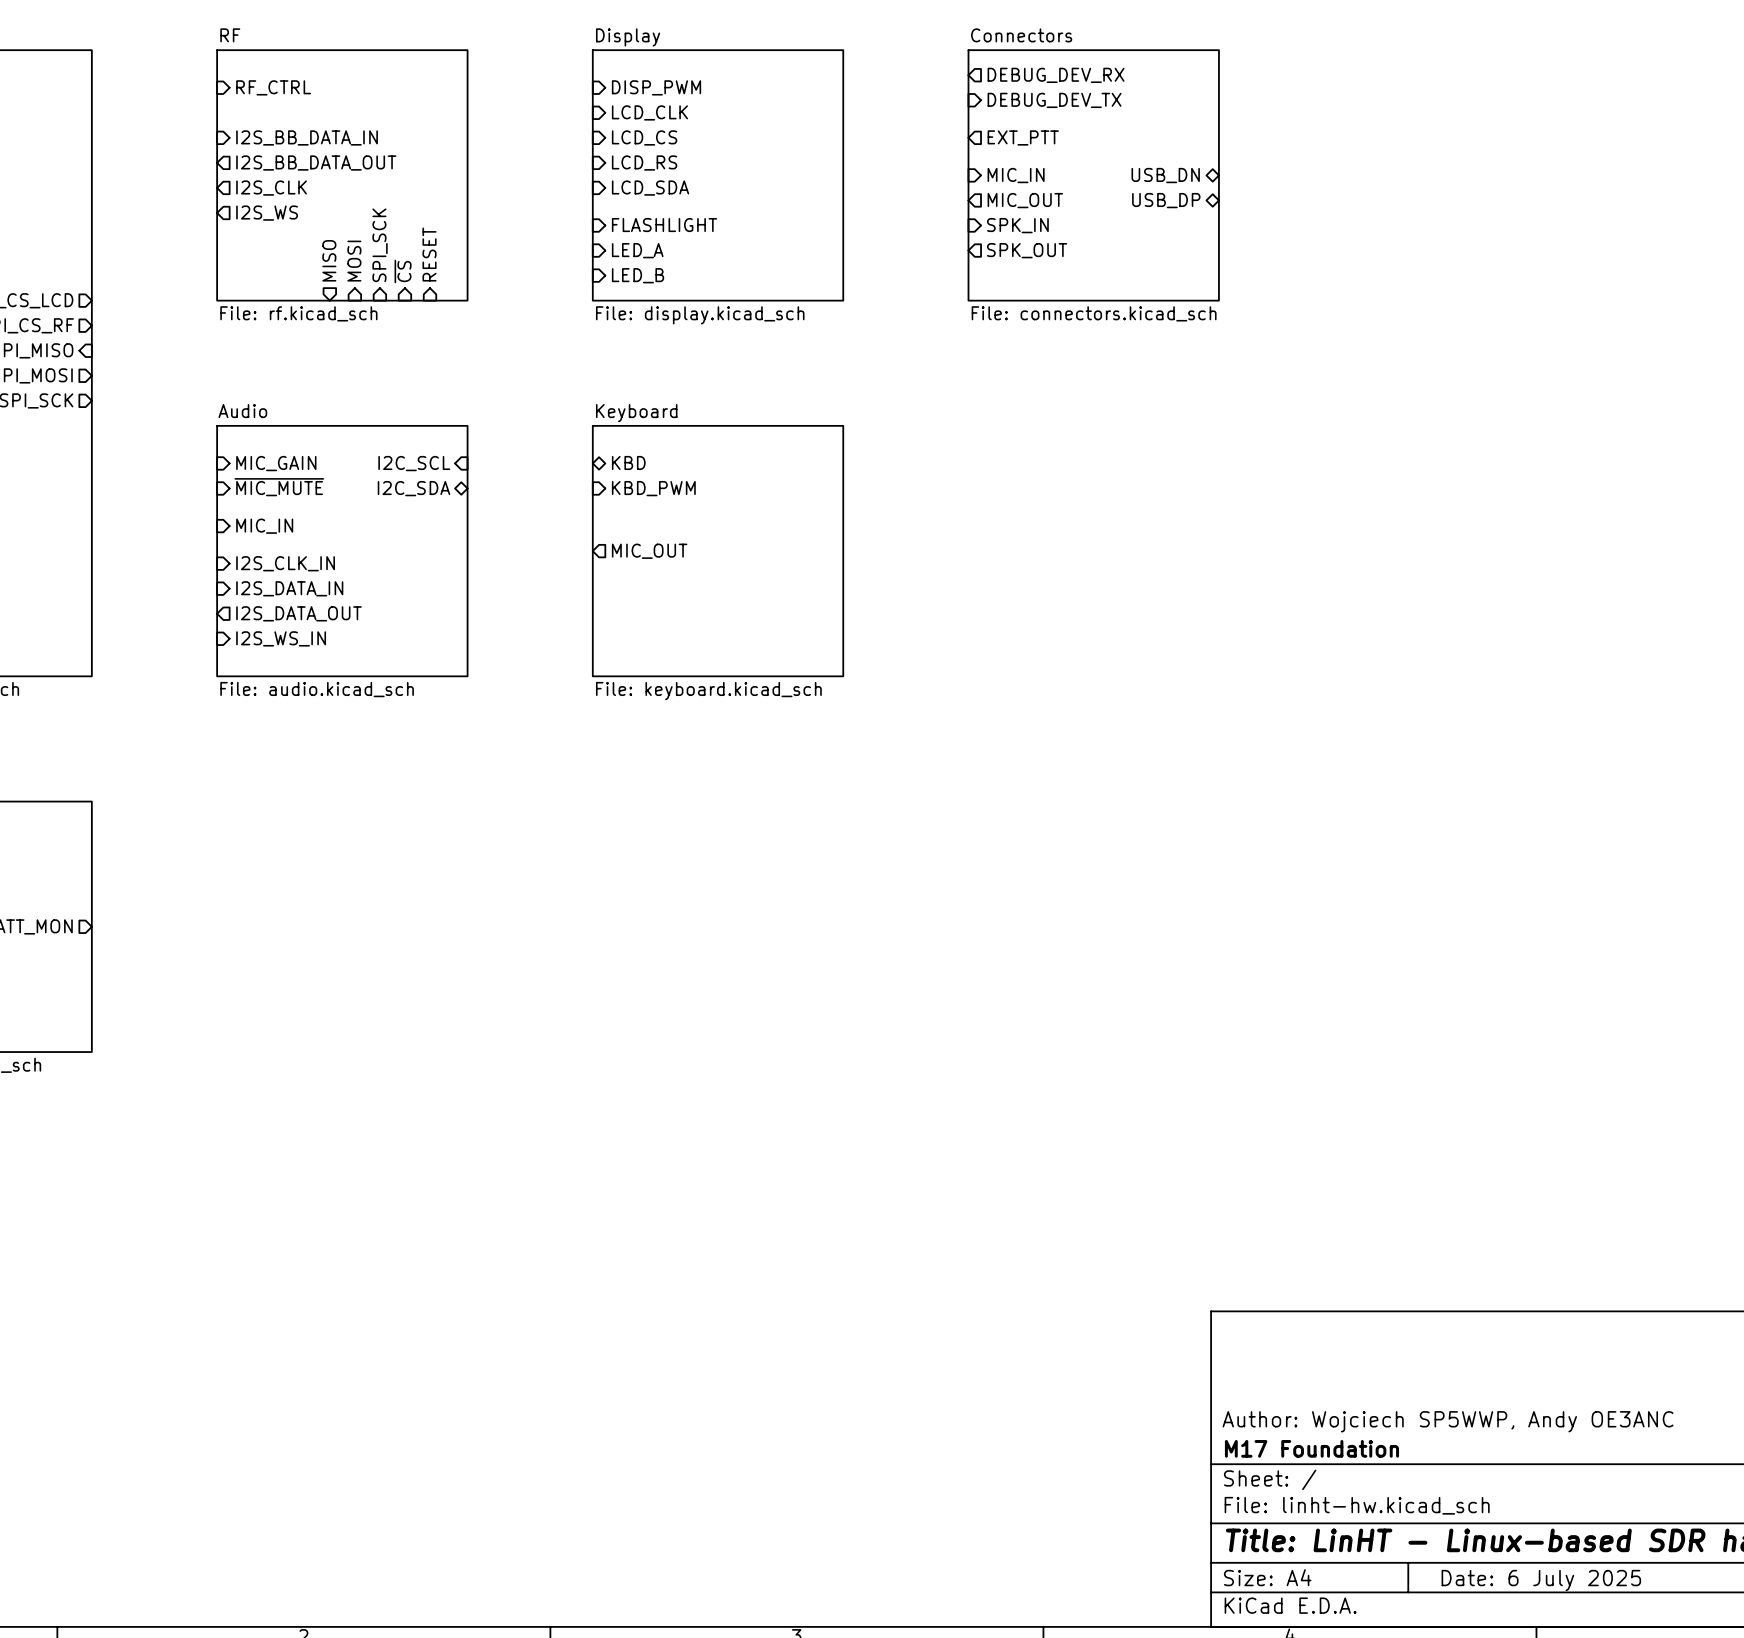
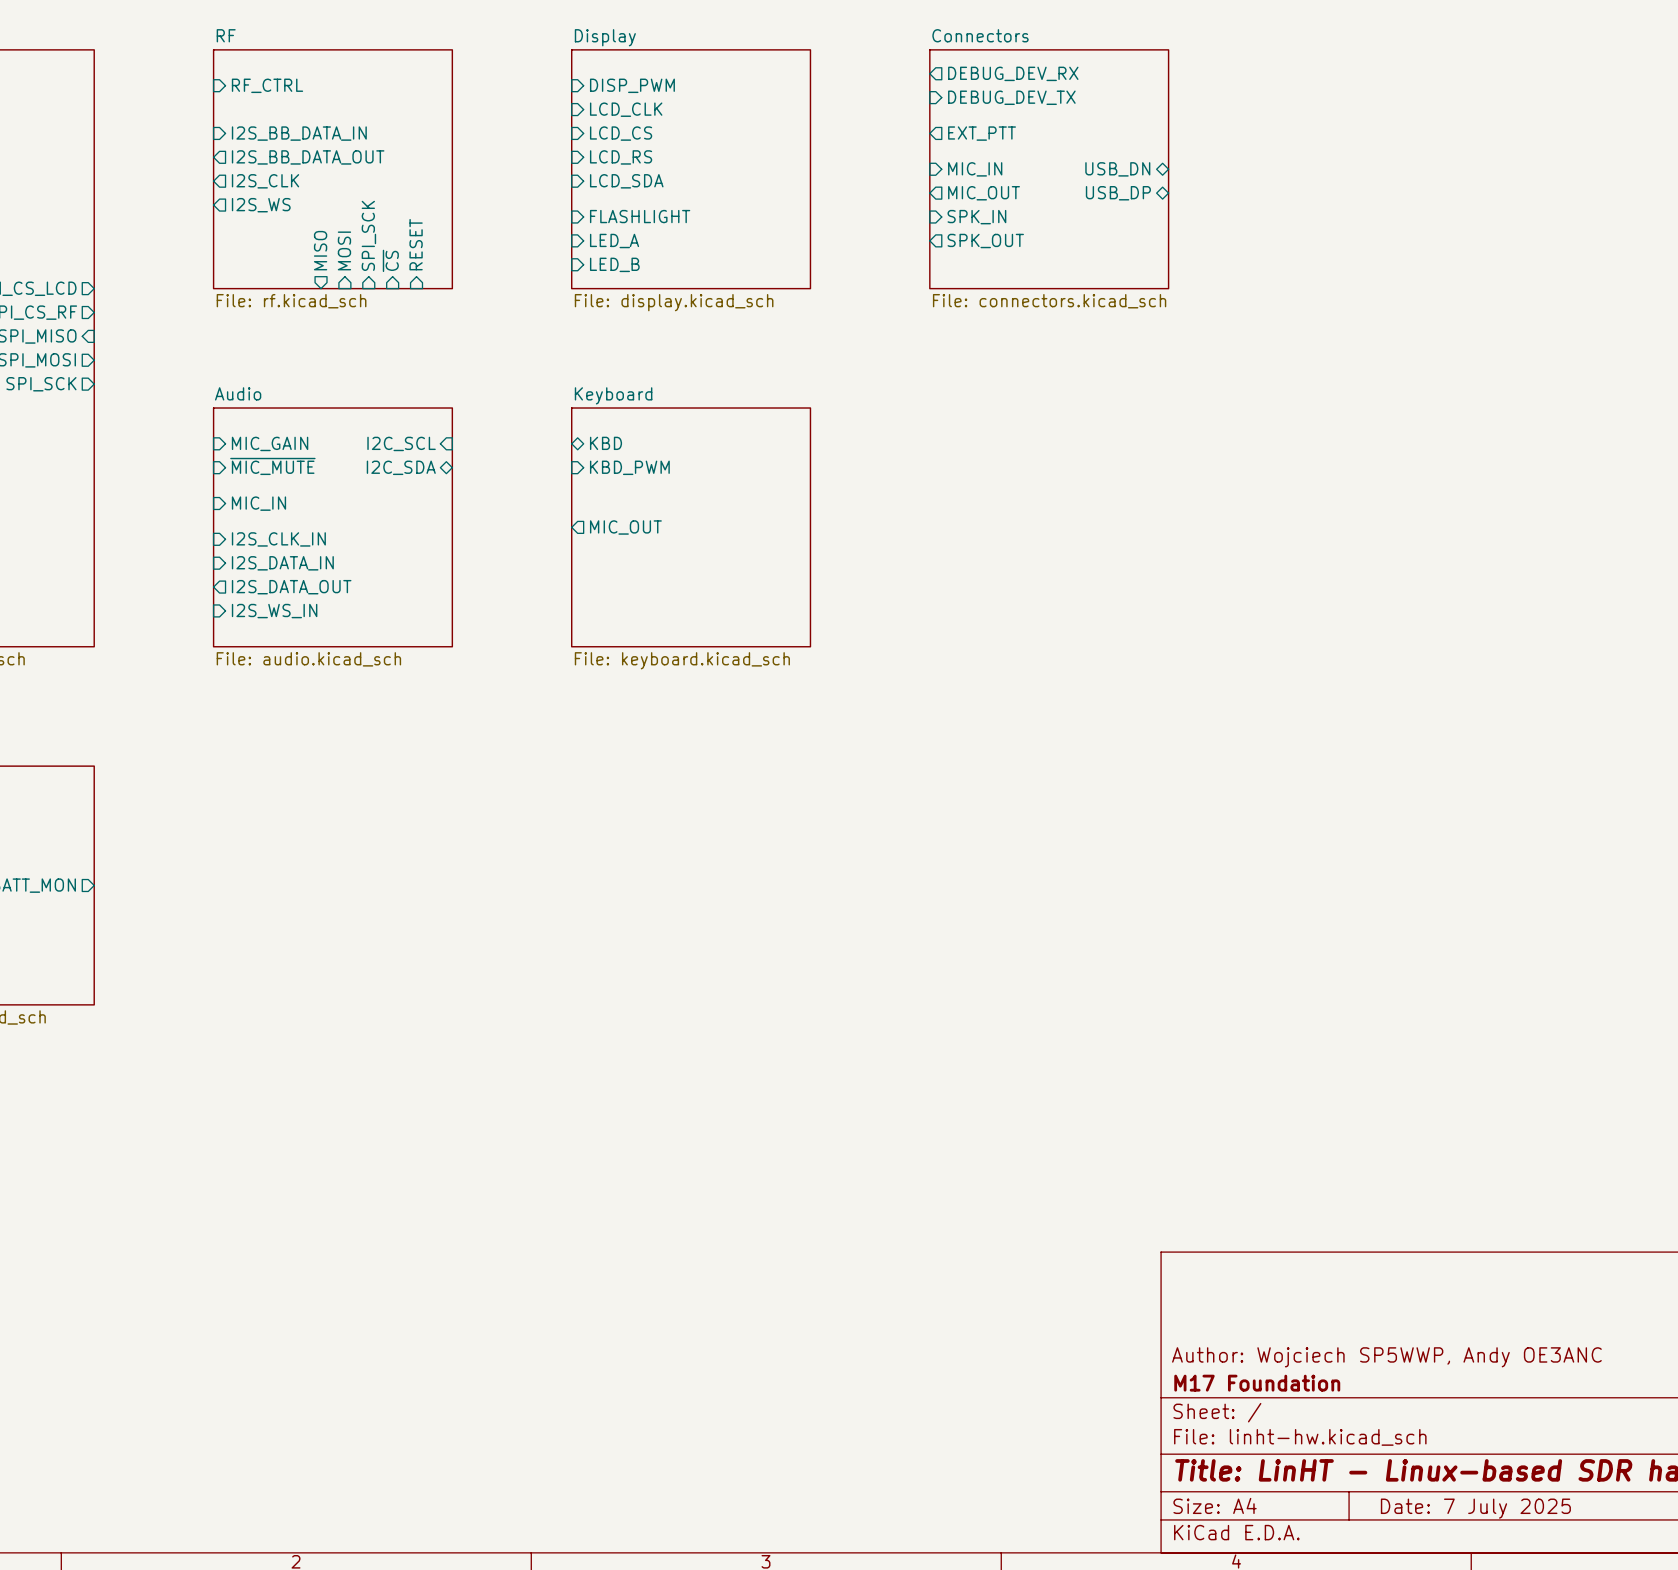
title block: Date: 6 July 2025 (1541, 1580) -> Date: 7 July 2025 (1475, 1508)

